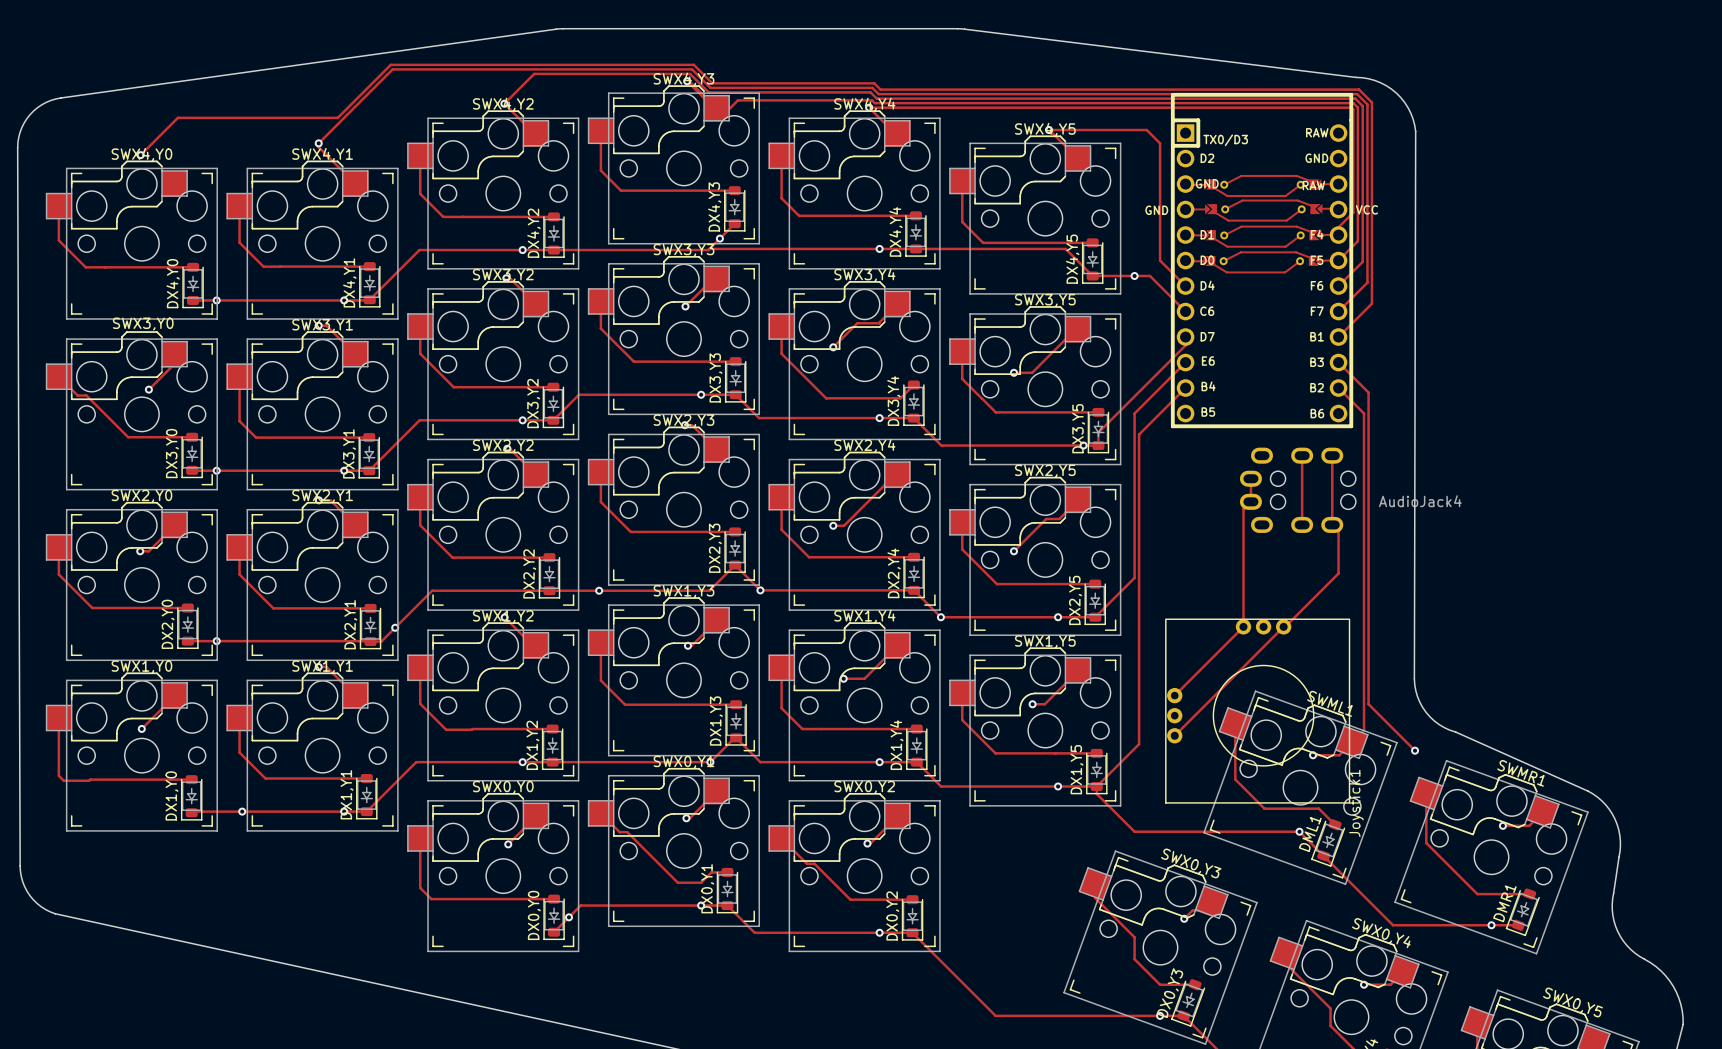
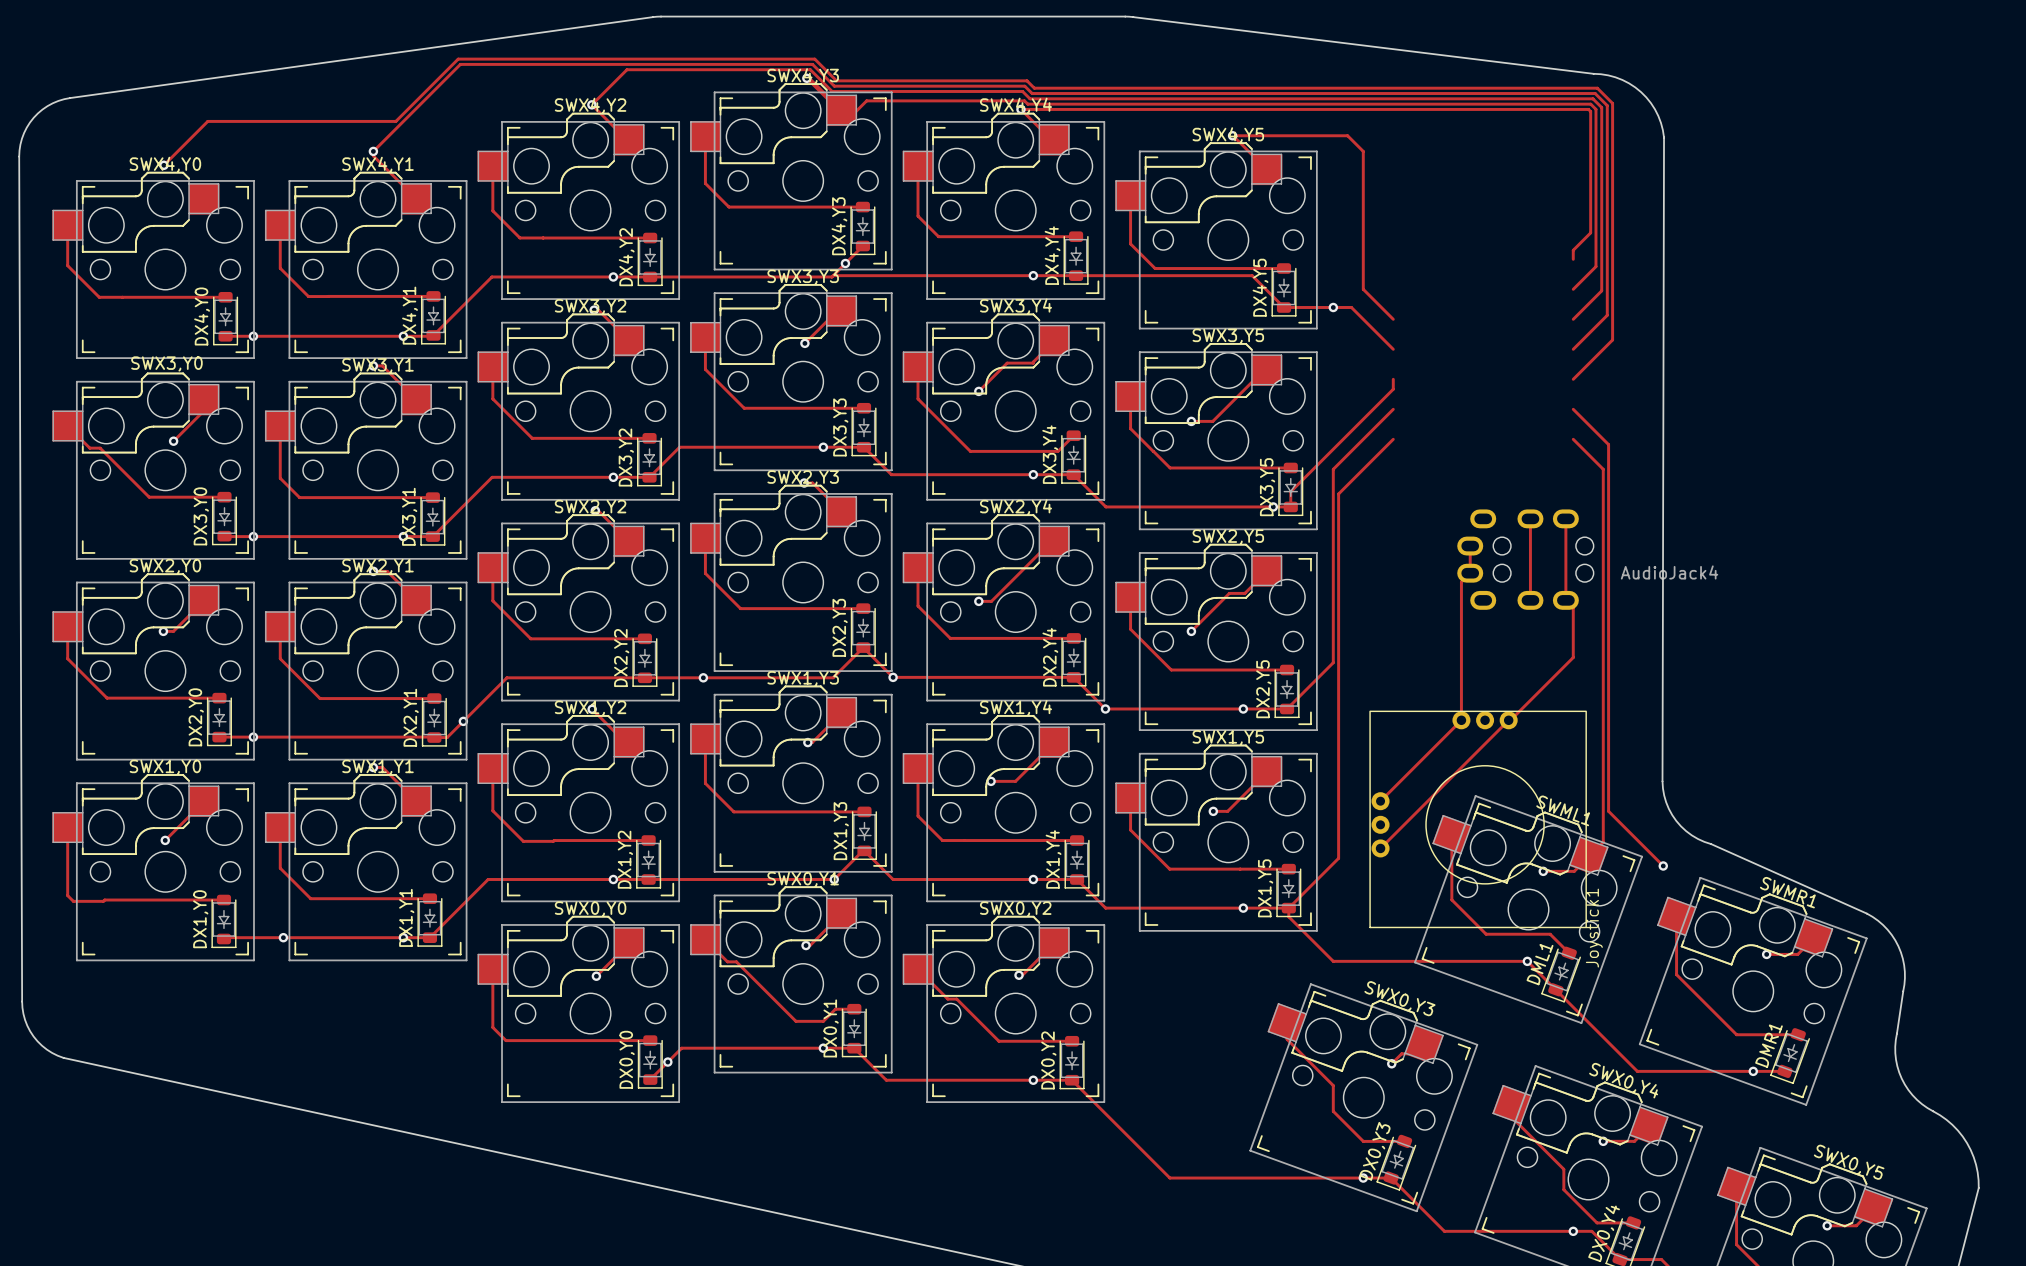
part: (1262, 260) -> none

